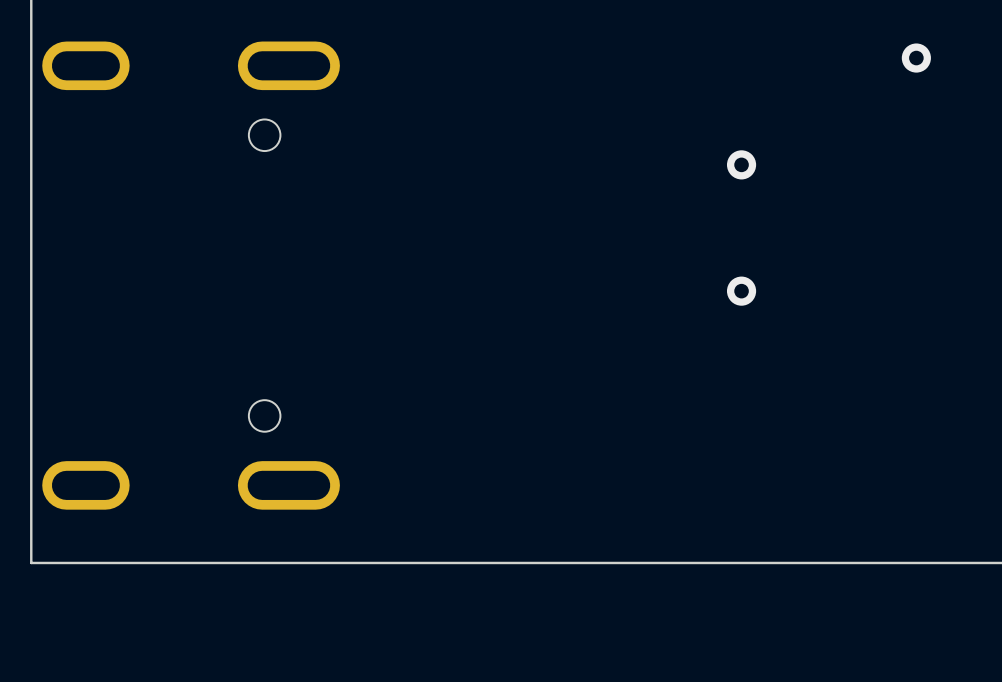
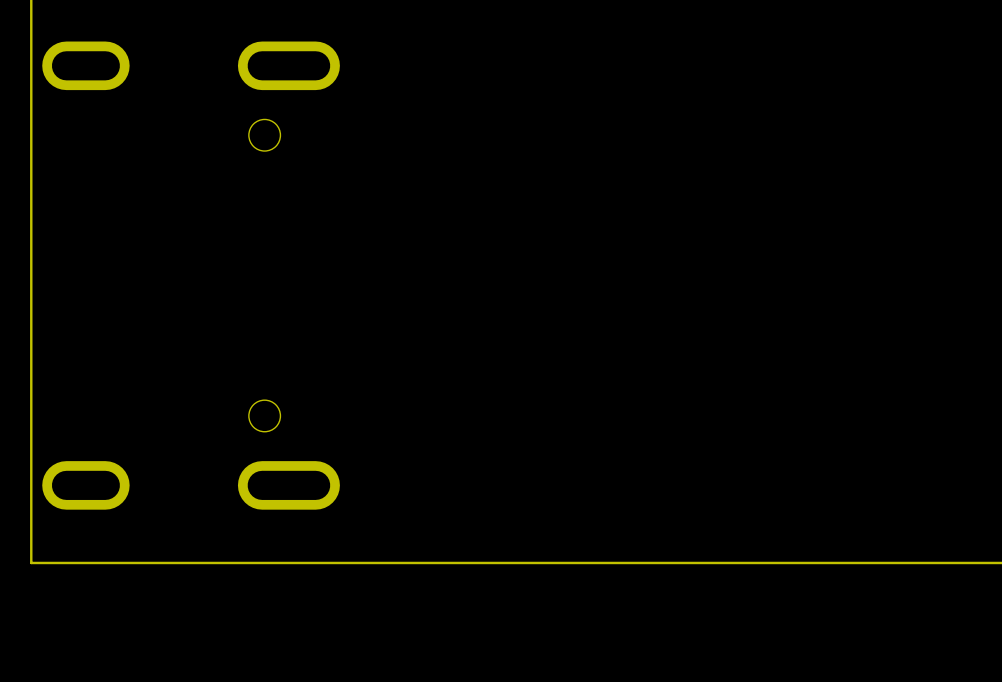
via: (916, 58) -> none
via: (741, 164) -> none
via: (741, 291) -> none

